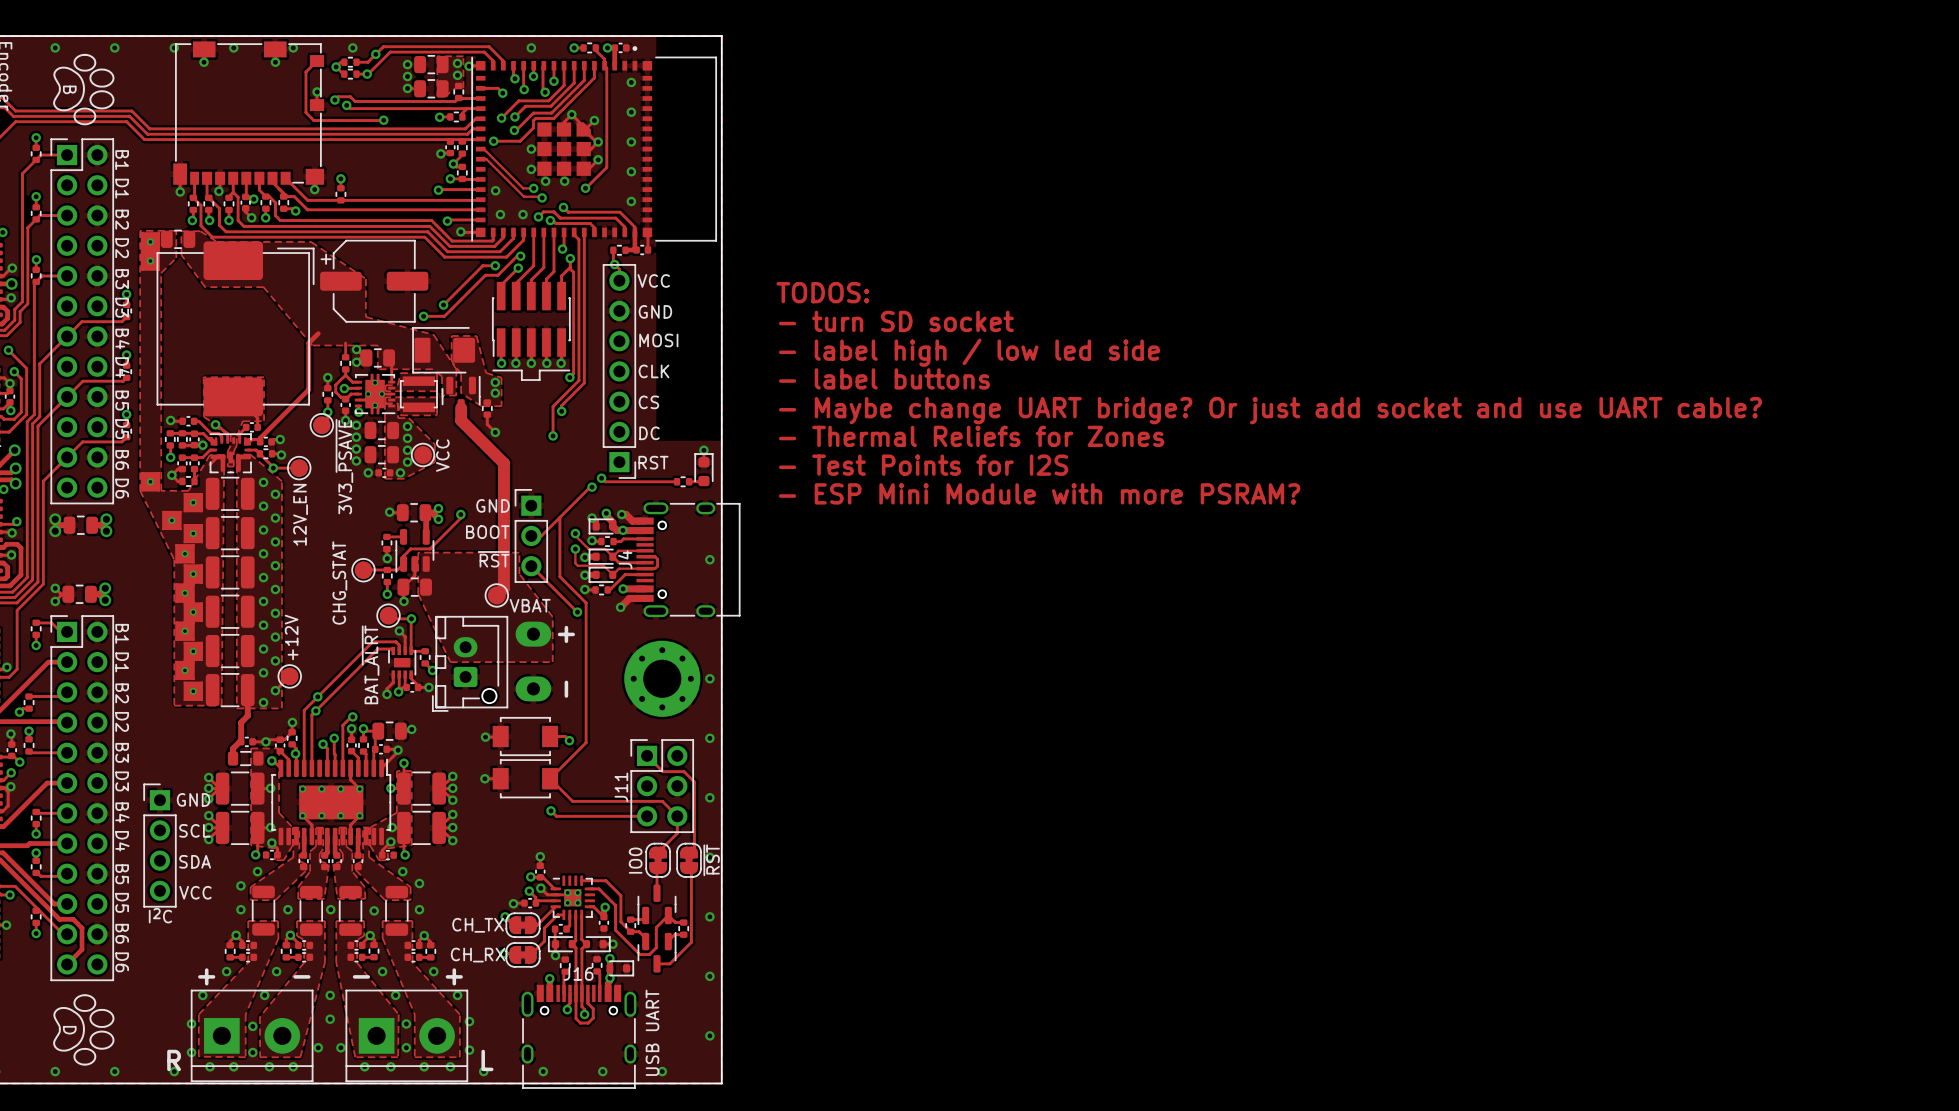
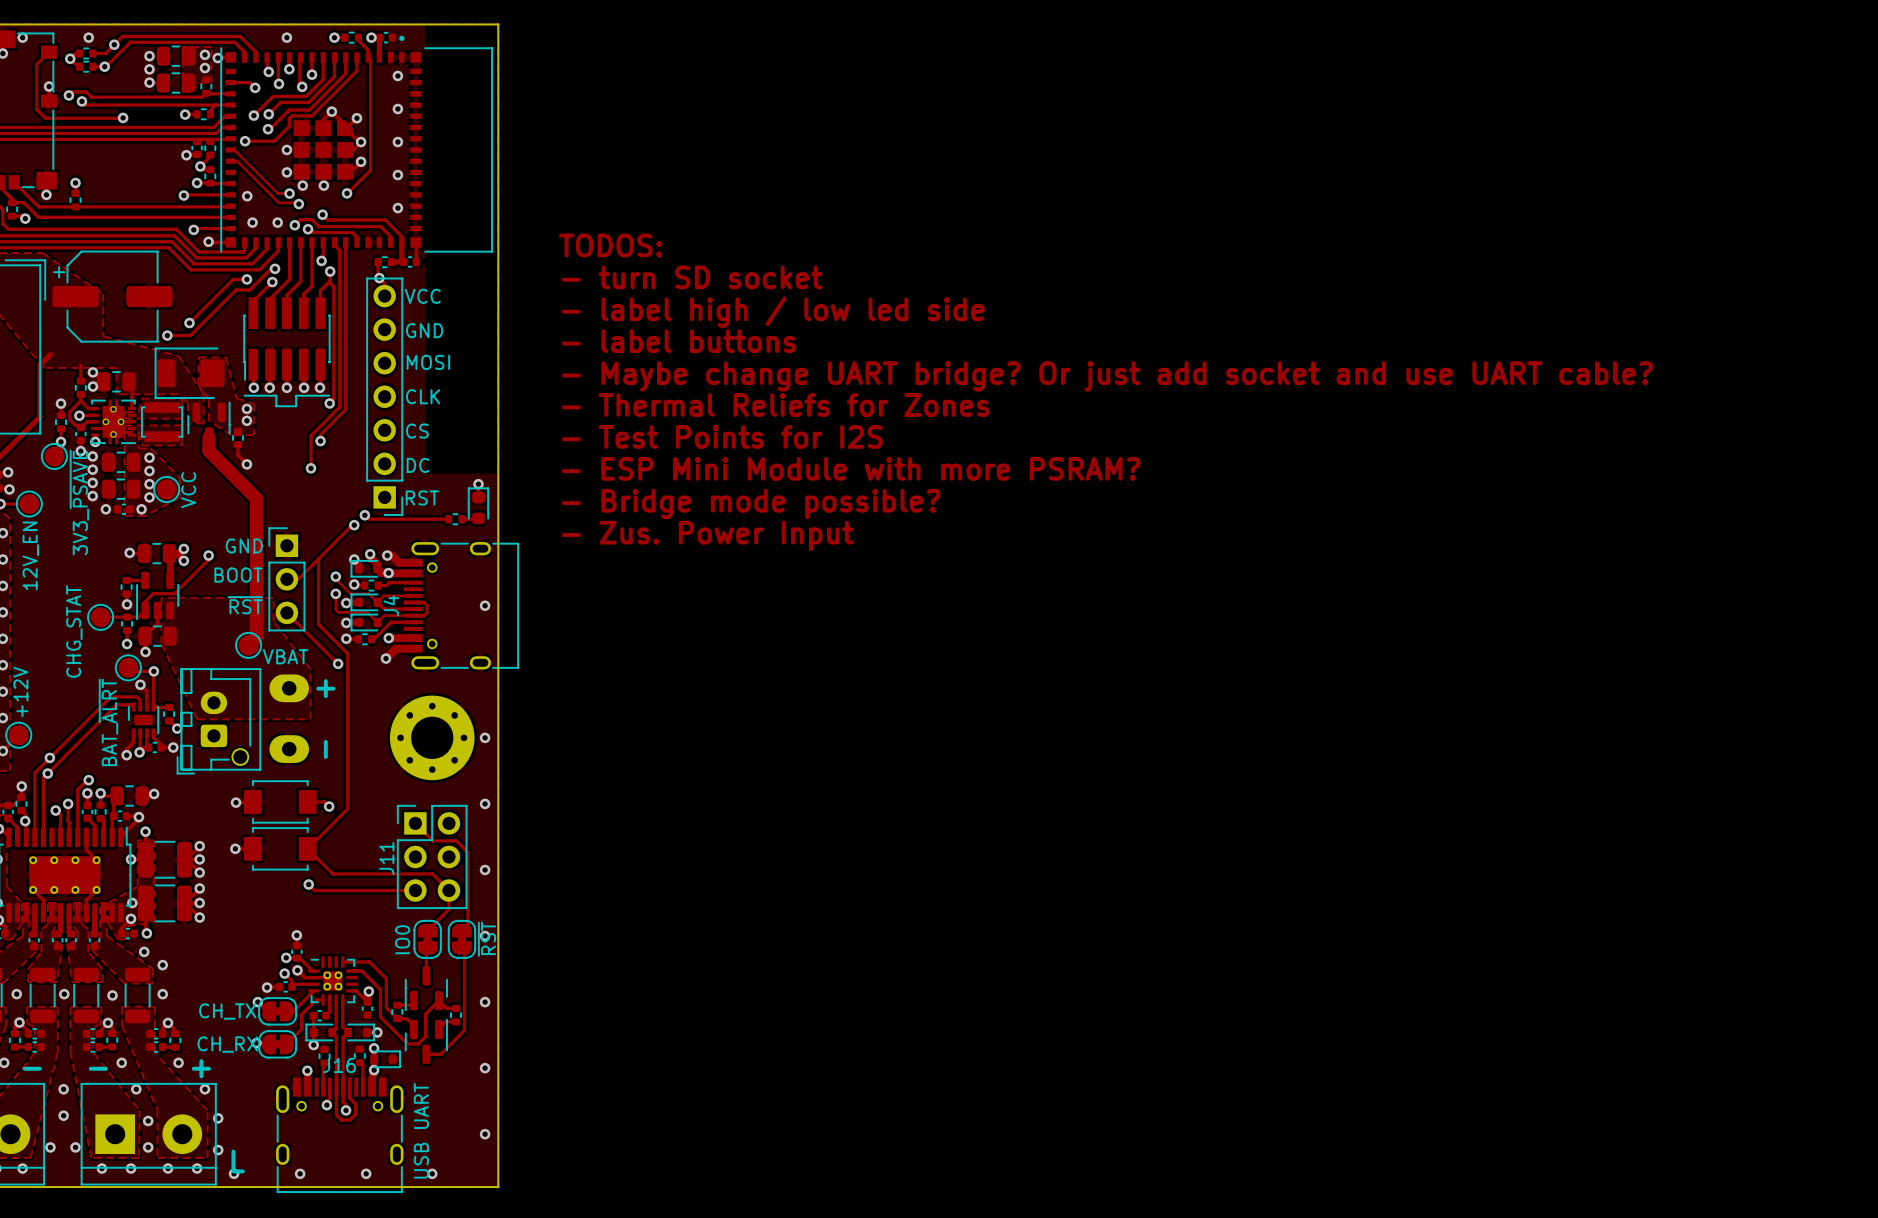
text: none -> TODOS: (610, 245)
text: none -> - turn SD socket (692, 277)
text: TODOS: (822, 292) -> - label high / low led side (773, 312)
text: - turn SD socket (896, 321) -> - label buttons (678, 341)
text: - label high / low led side (969, 352) -> - Maybe change UART bridge? Or just add socket and use UART cable? (1107, 376)
text: - label buttons (884, 378) -> - Thermal Reliefs for Zones (775, 405)
text: - Maybe change UART bridge? Or just add socket and use UART cable? (1270, 410) -> - Test Points for I2S (722, 436)
text: - Thermal Reliefs for Zones (971, 436) -> - ESP Mini Module with more PSRAM? (851, 468)
text: - Test Points for I2S (923, 465) -> - Bridge mode possible? (751, 504)
text: - ESP Mini Module with more PSRAM? (1039, 493) -> - Zus. Power Input (707, 535)

